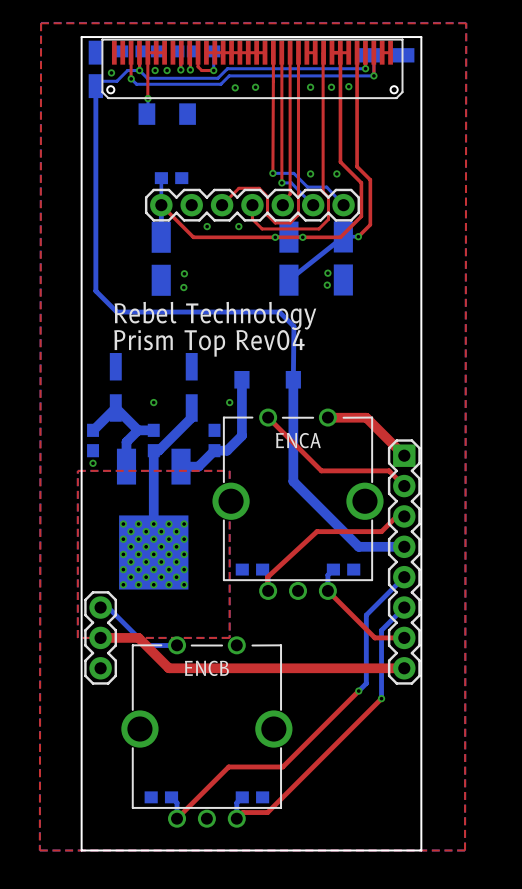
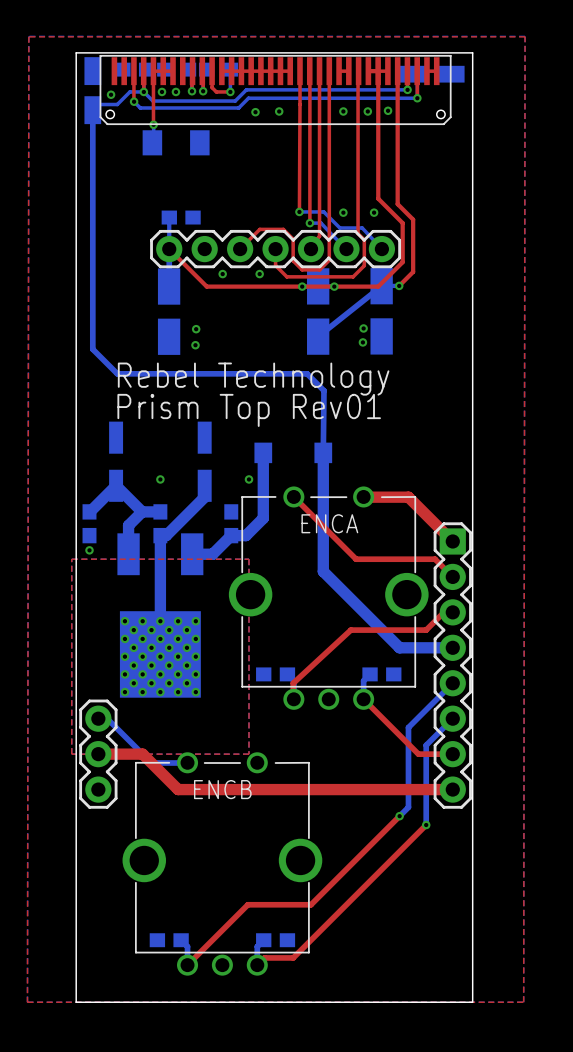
text: Prism Top Rev04 (209, 343) -> Prism Top Rev01 (249, 410)

